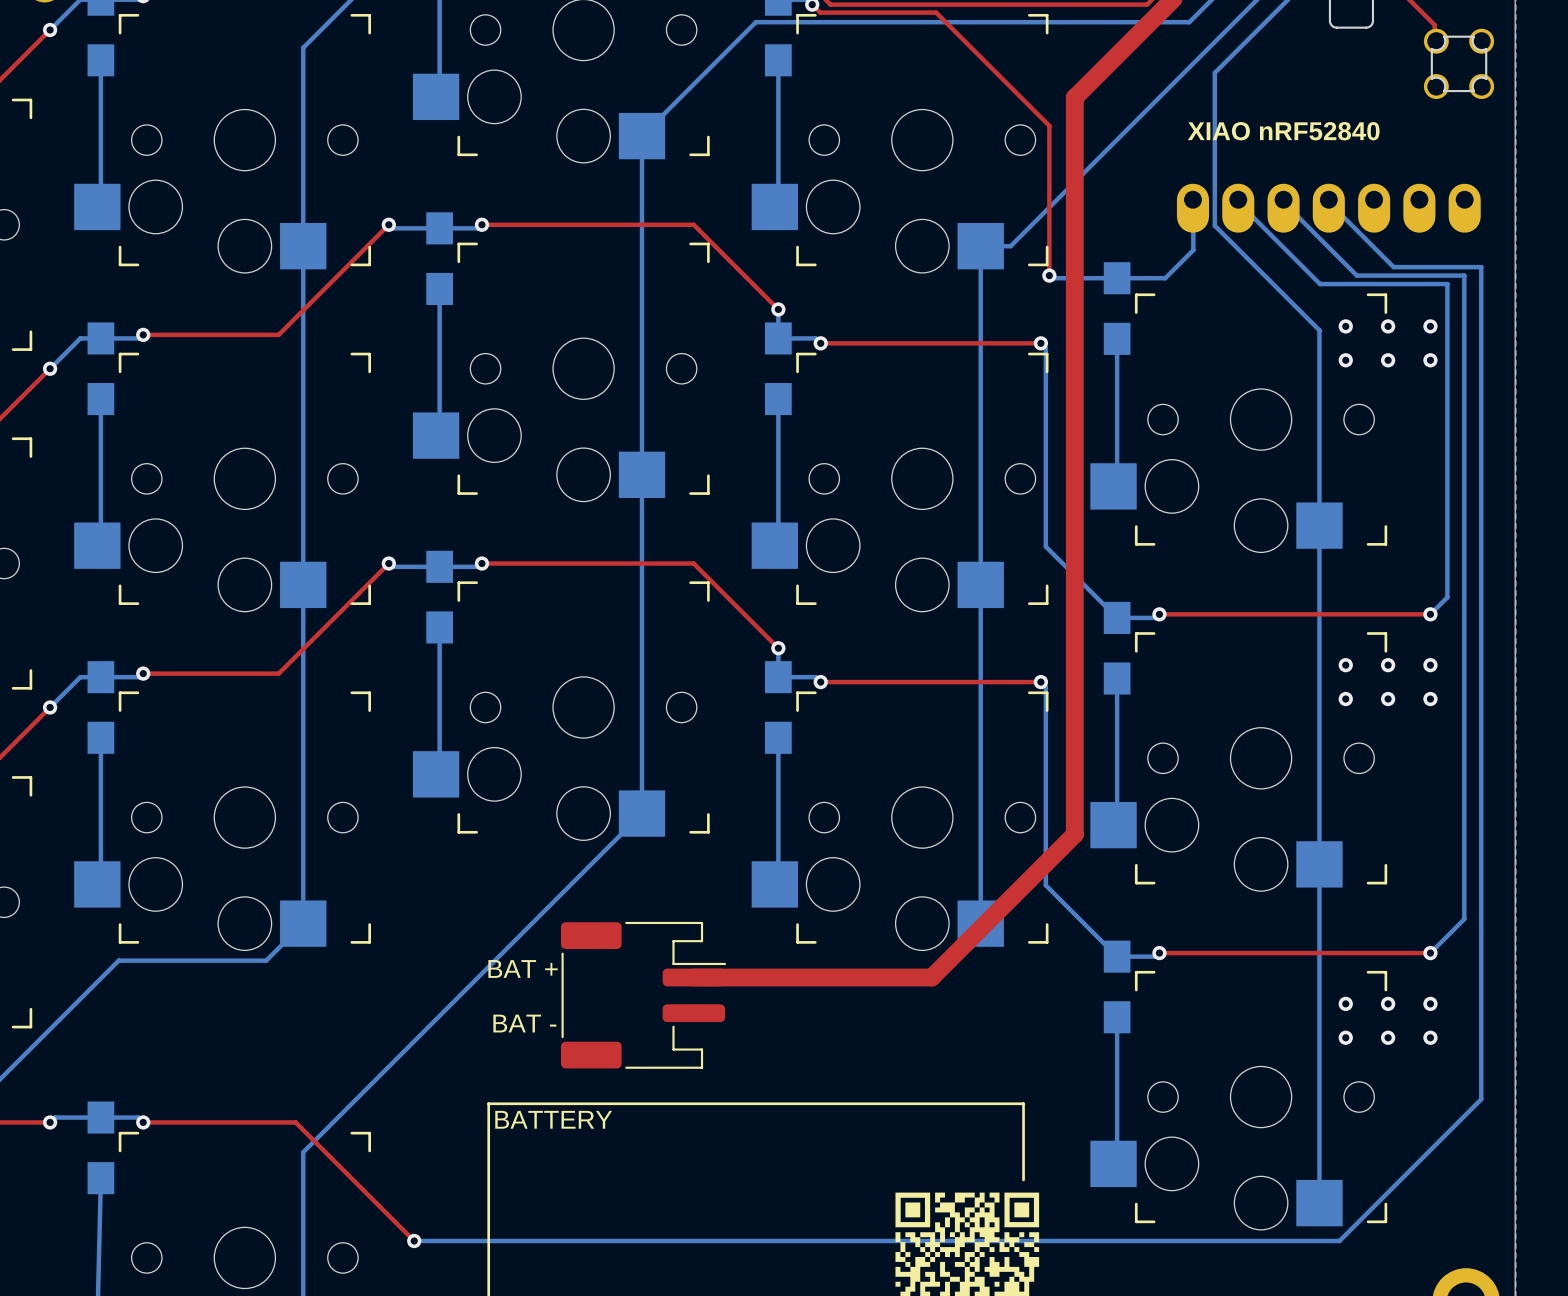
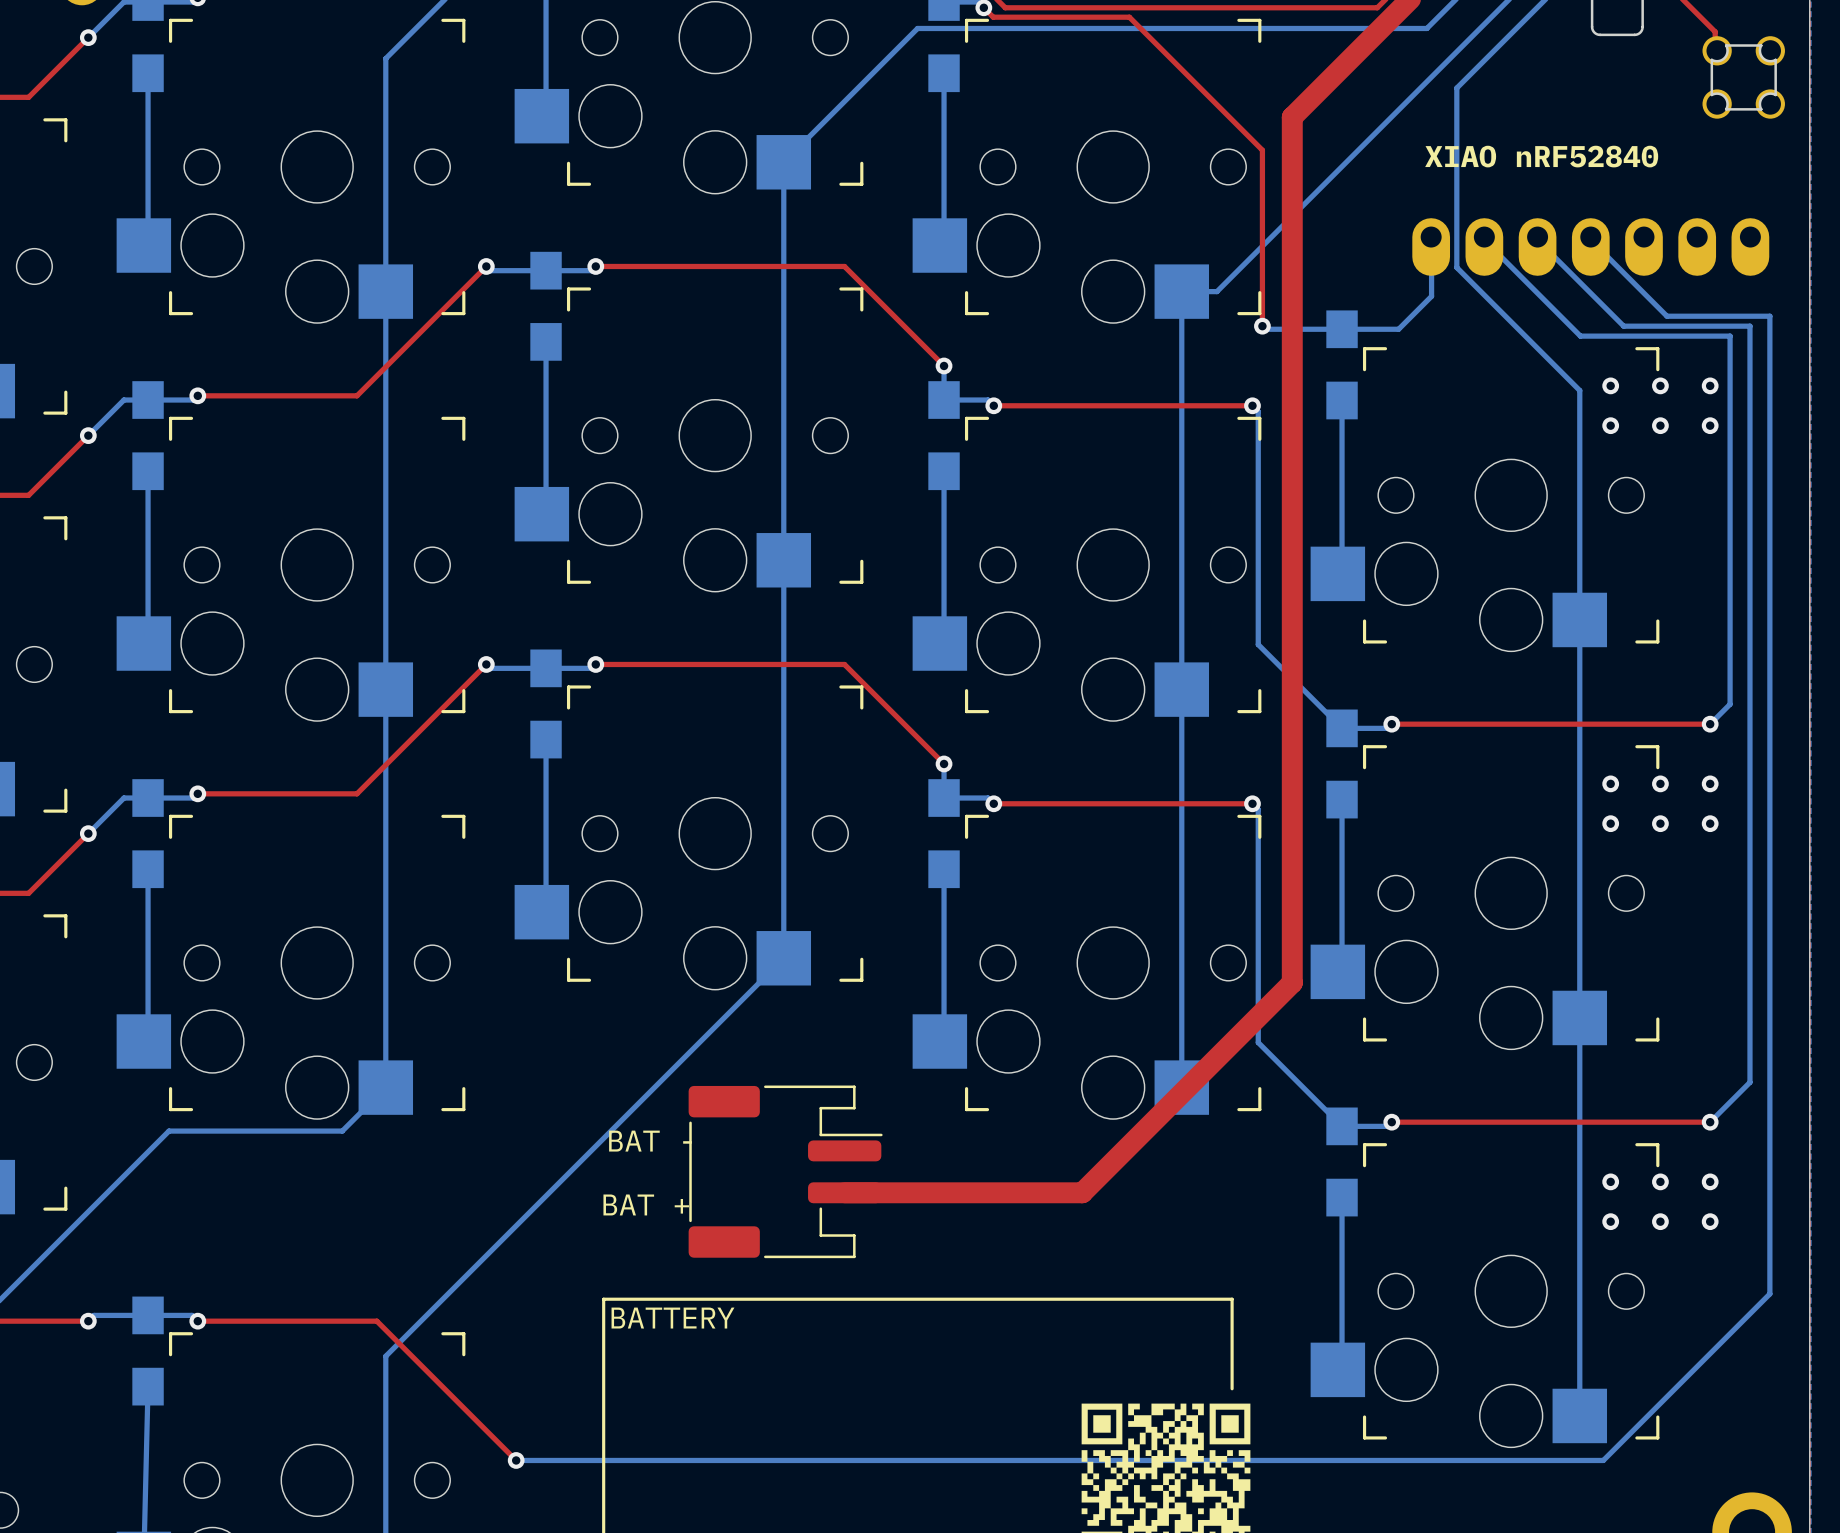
text: BAT + (523, 968) -> BAT - (650, 1141)
top track: (693, 977) (931, 977) -> (844, 1192) (1082, 1192) (1124, 1150)
text: BAT - (524, 1023) -> BAT + (646, 1204)

